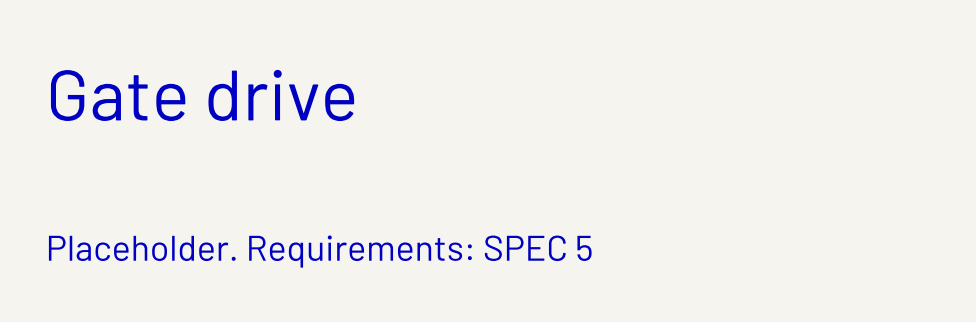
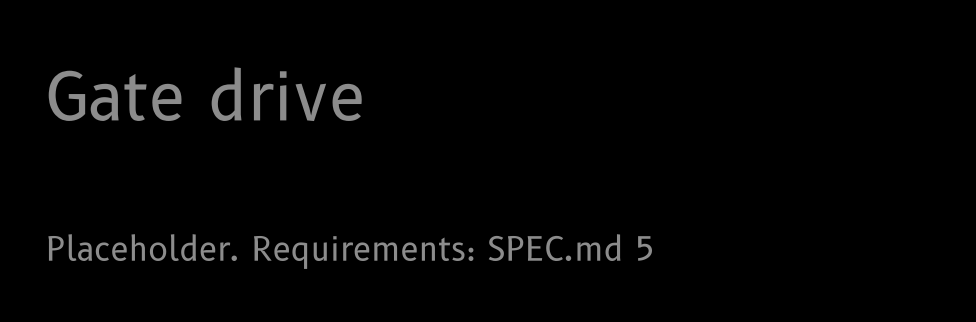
text: Placeholder. Requirements: SPEC 5 (320, 251) -> Placeholder. Requirements: SPEC.md 5 (350, 251)

